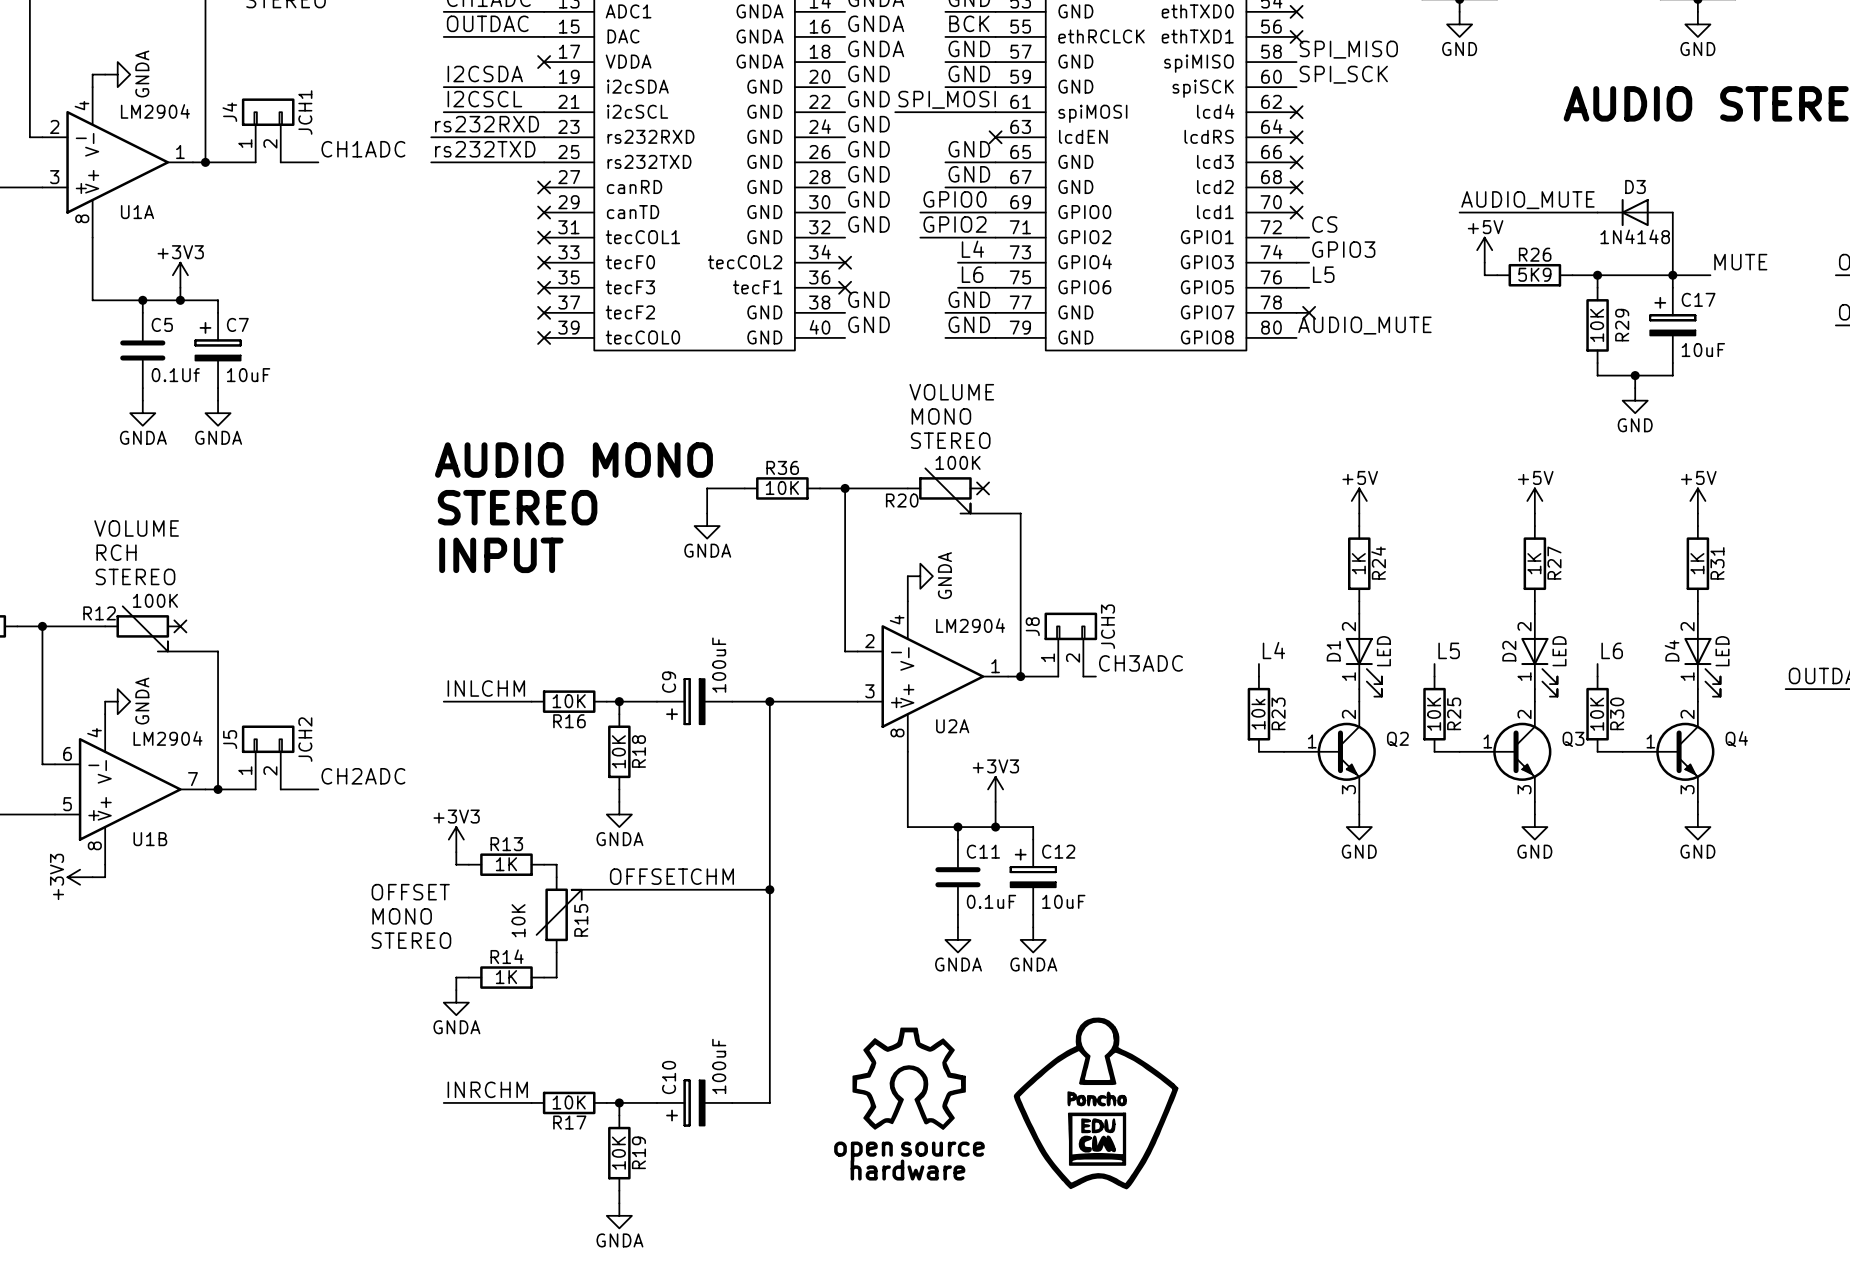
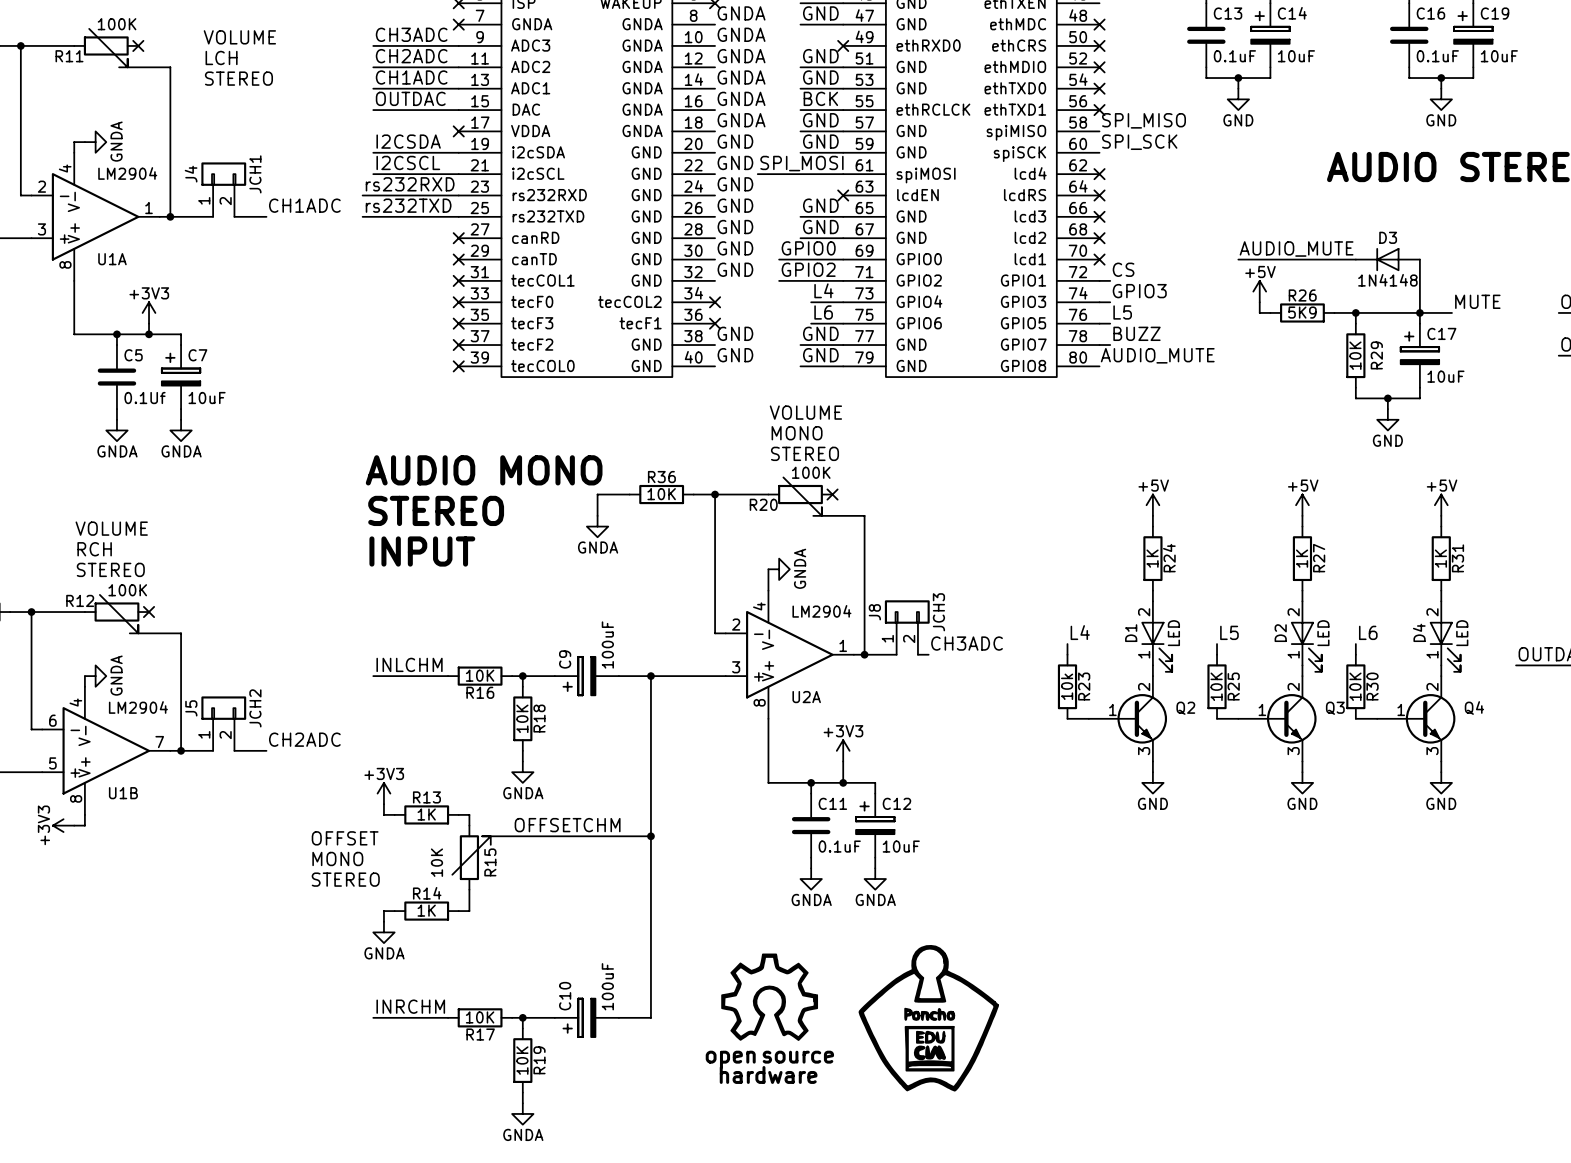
label: none -> BUZZ (1136, 333)
no-connect mark: (1309, 312) -> none

